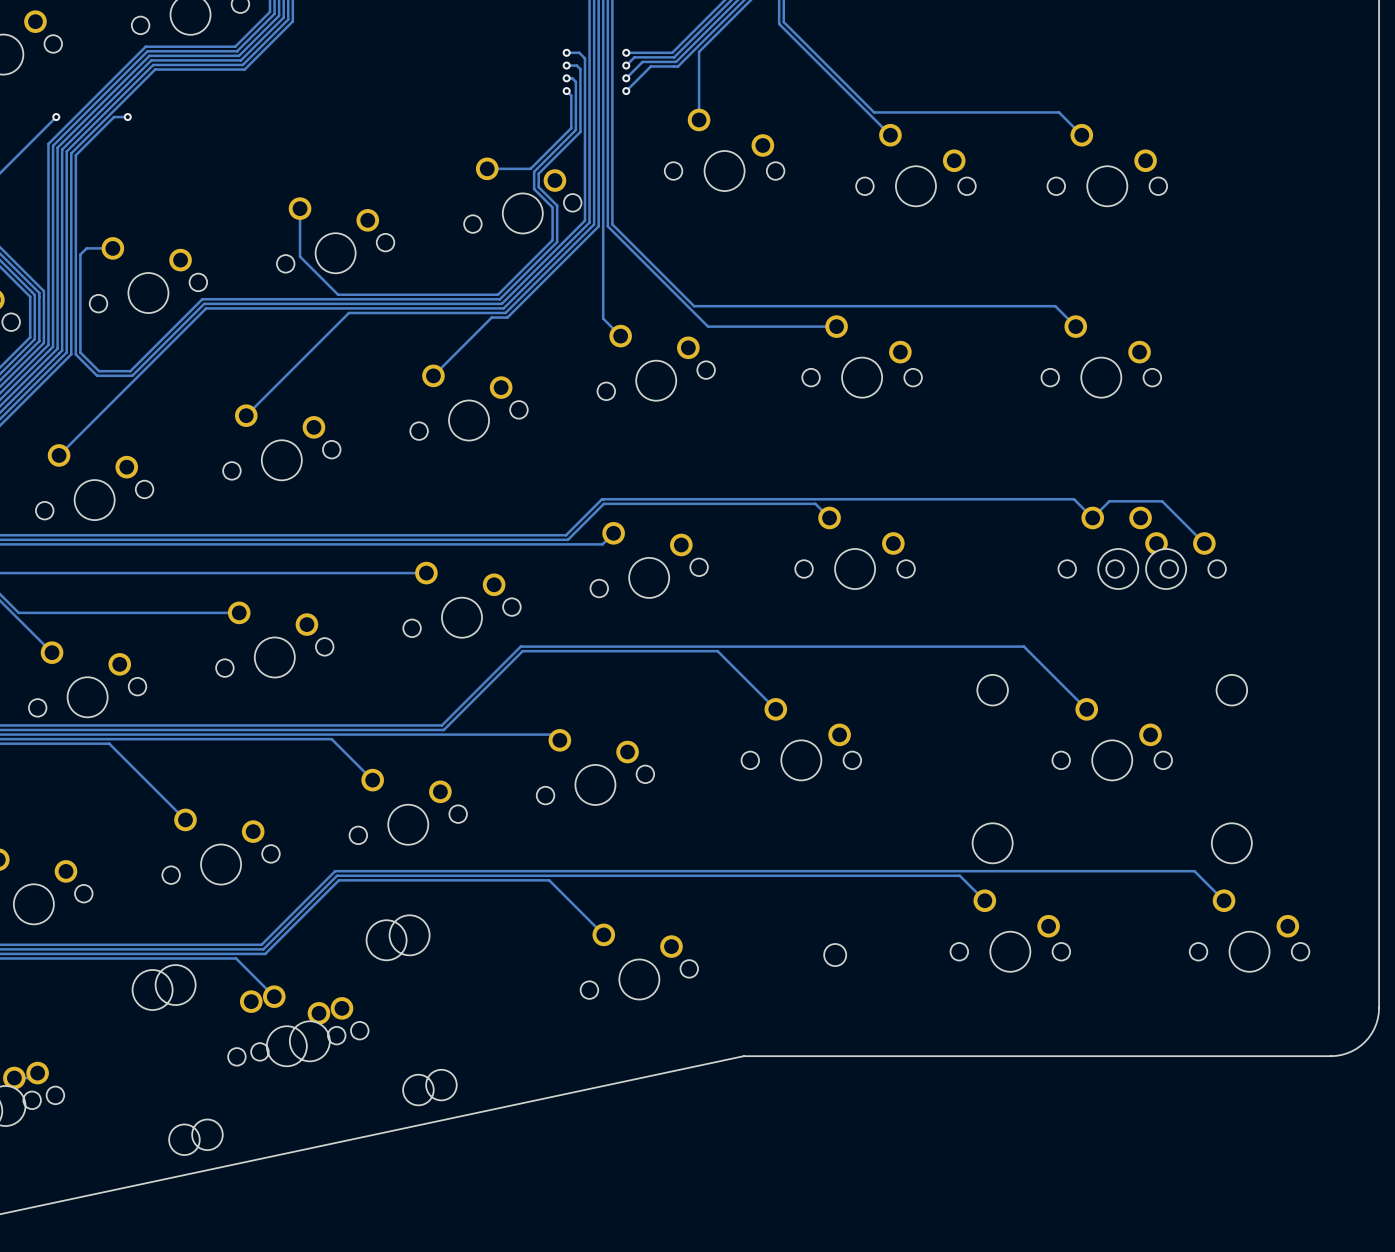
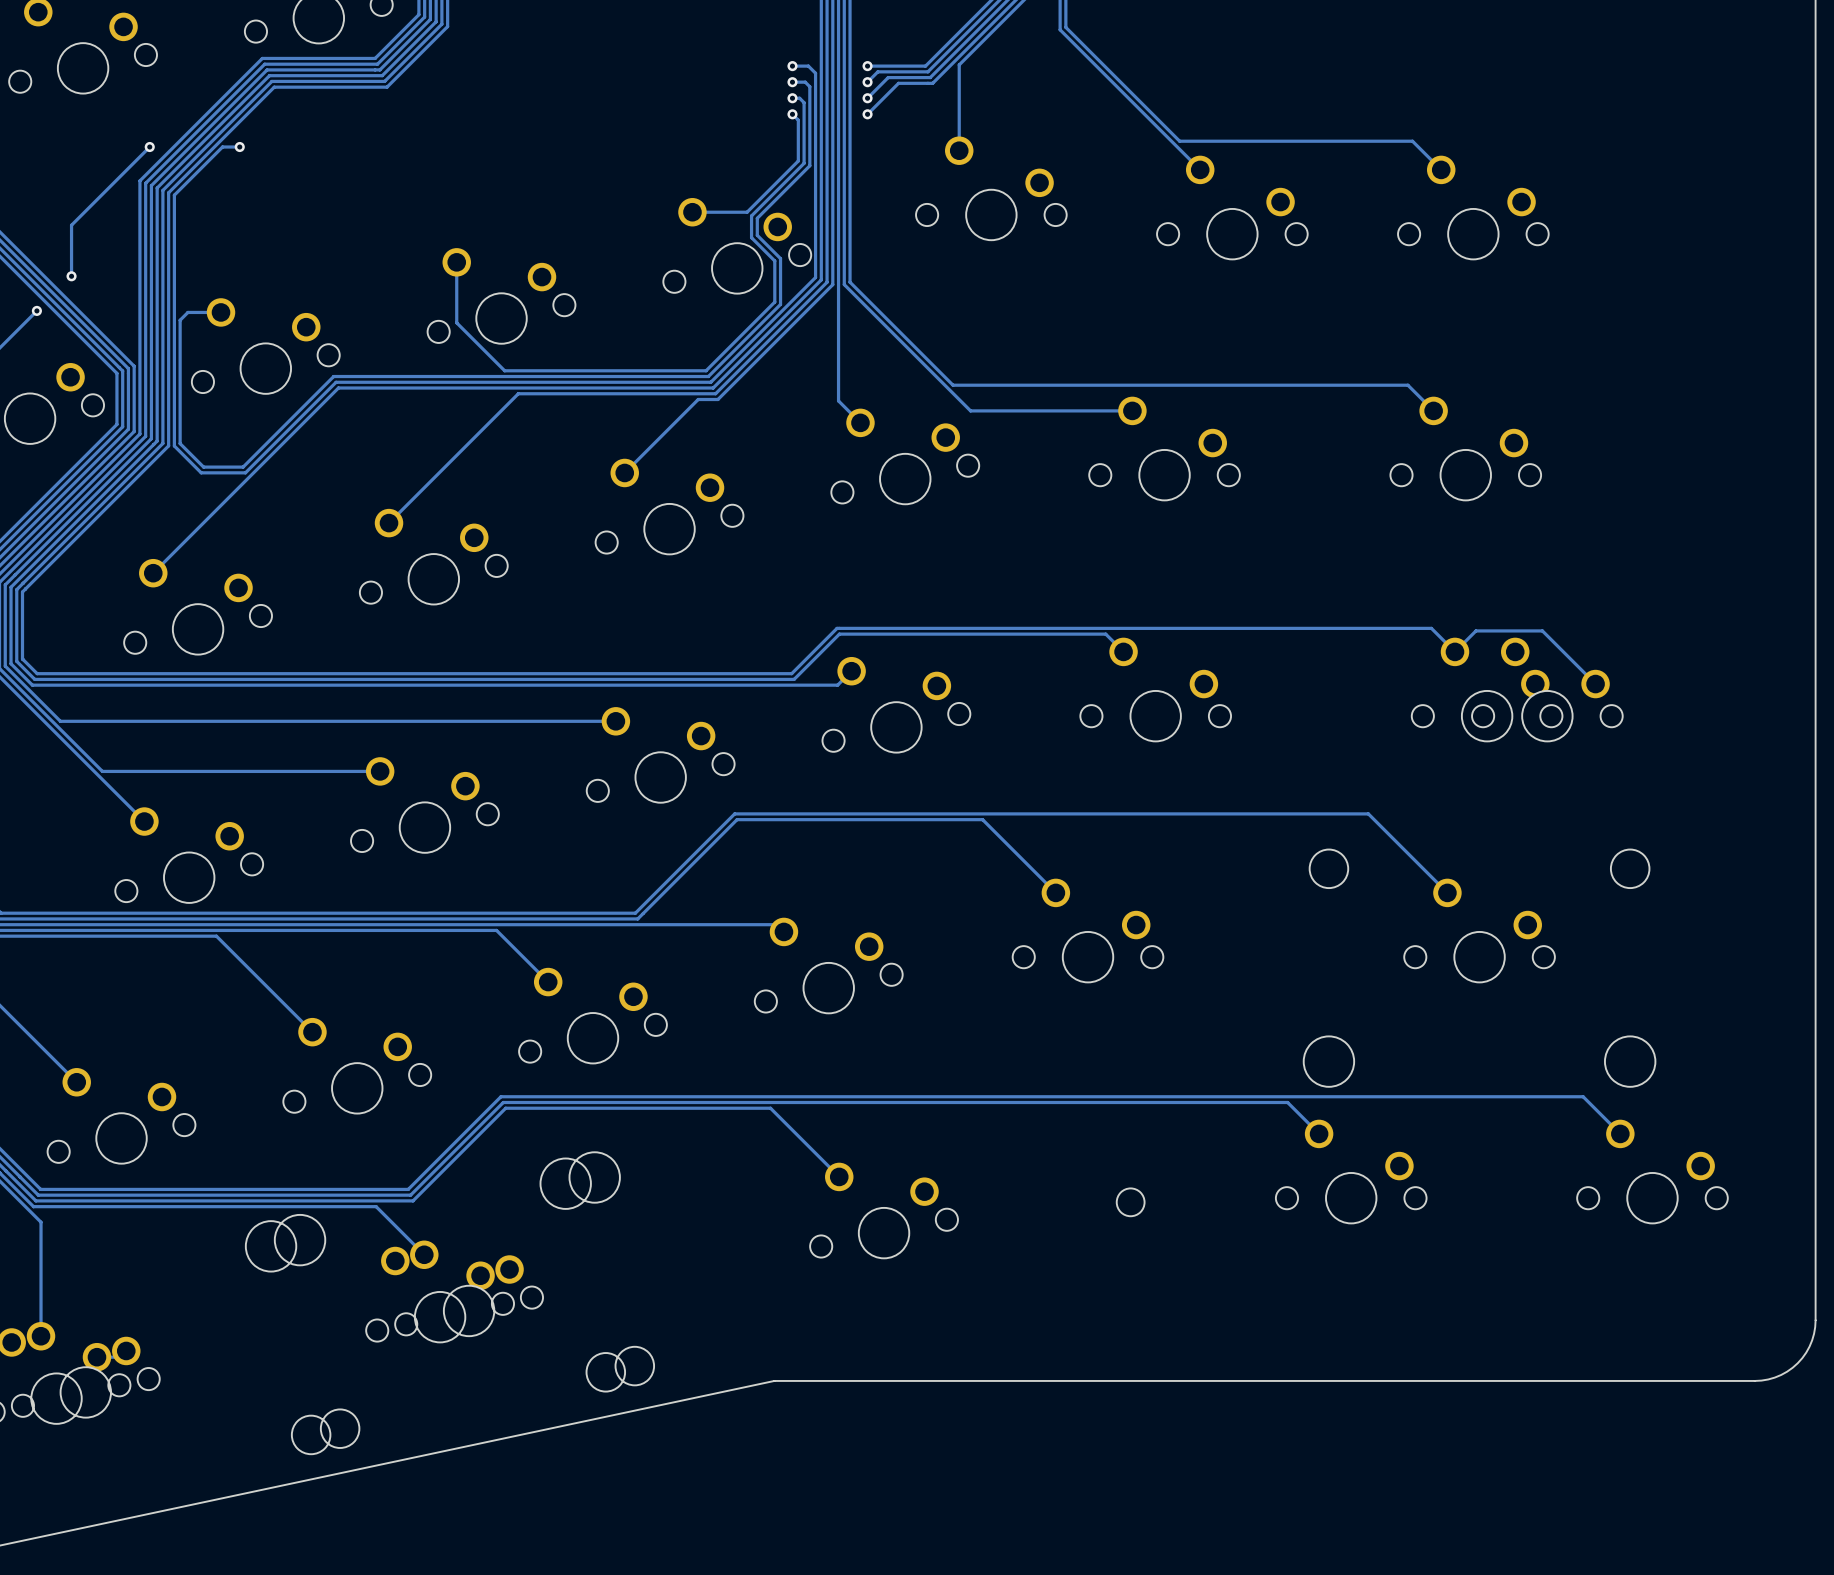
board edge: (1379, 1007) (1374, 1028) (1364, 1042) (1351, 1051) (1336, 1055) (743, 1056) (552, 1096) -> (1815, 1268) (1815, 1327) (1809, 1346) (1802, 1358) (1792, 1367) (1781, 1374) (1761, 1380) (774, 1380)

